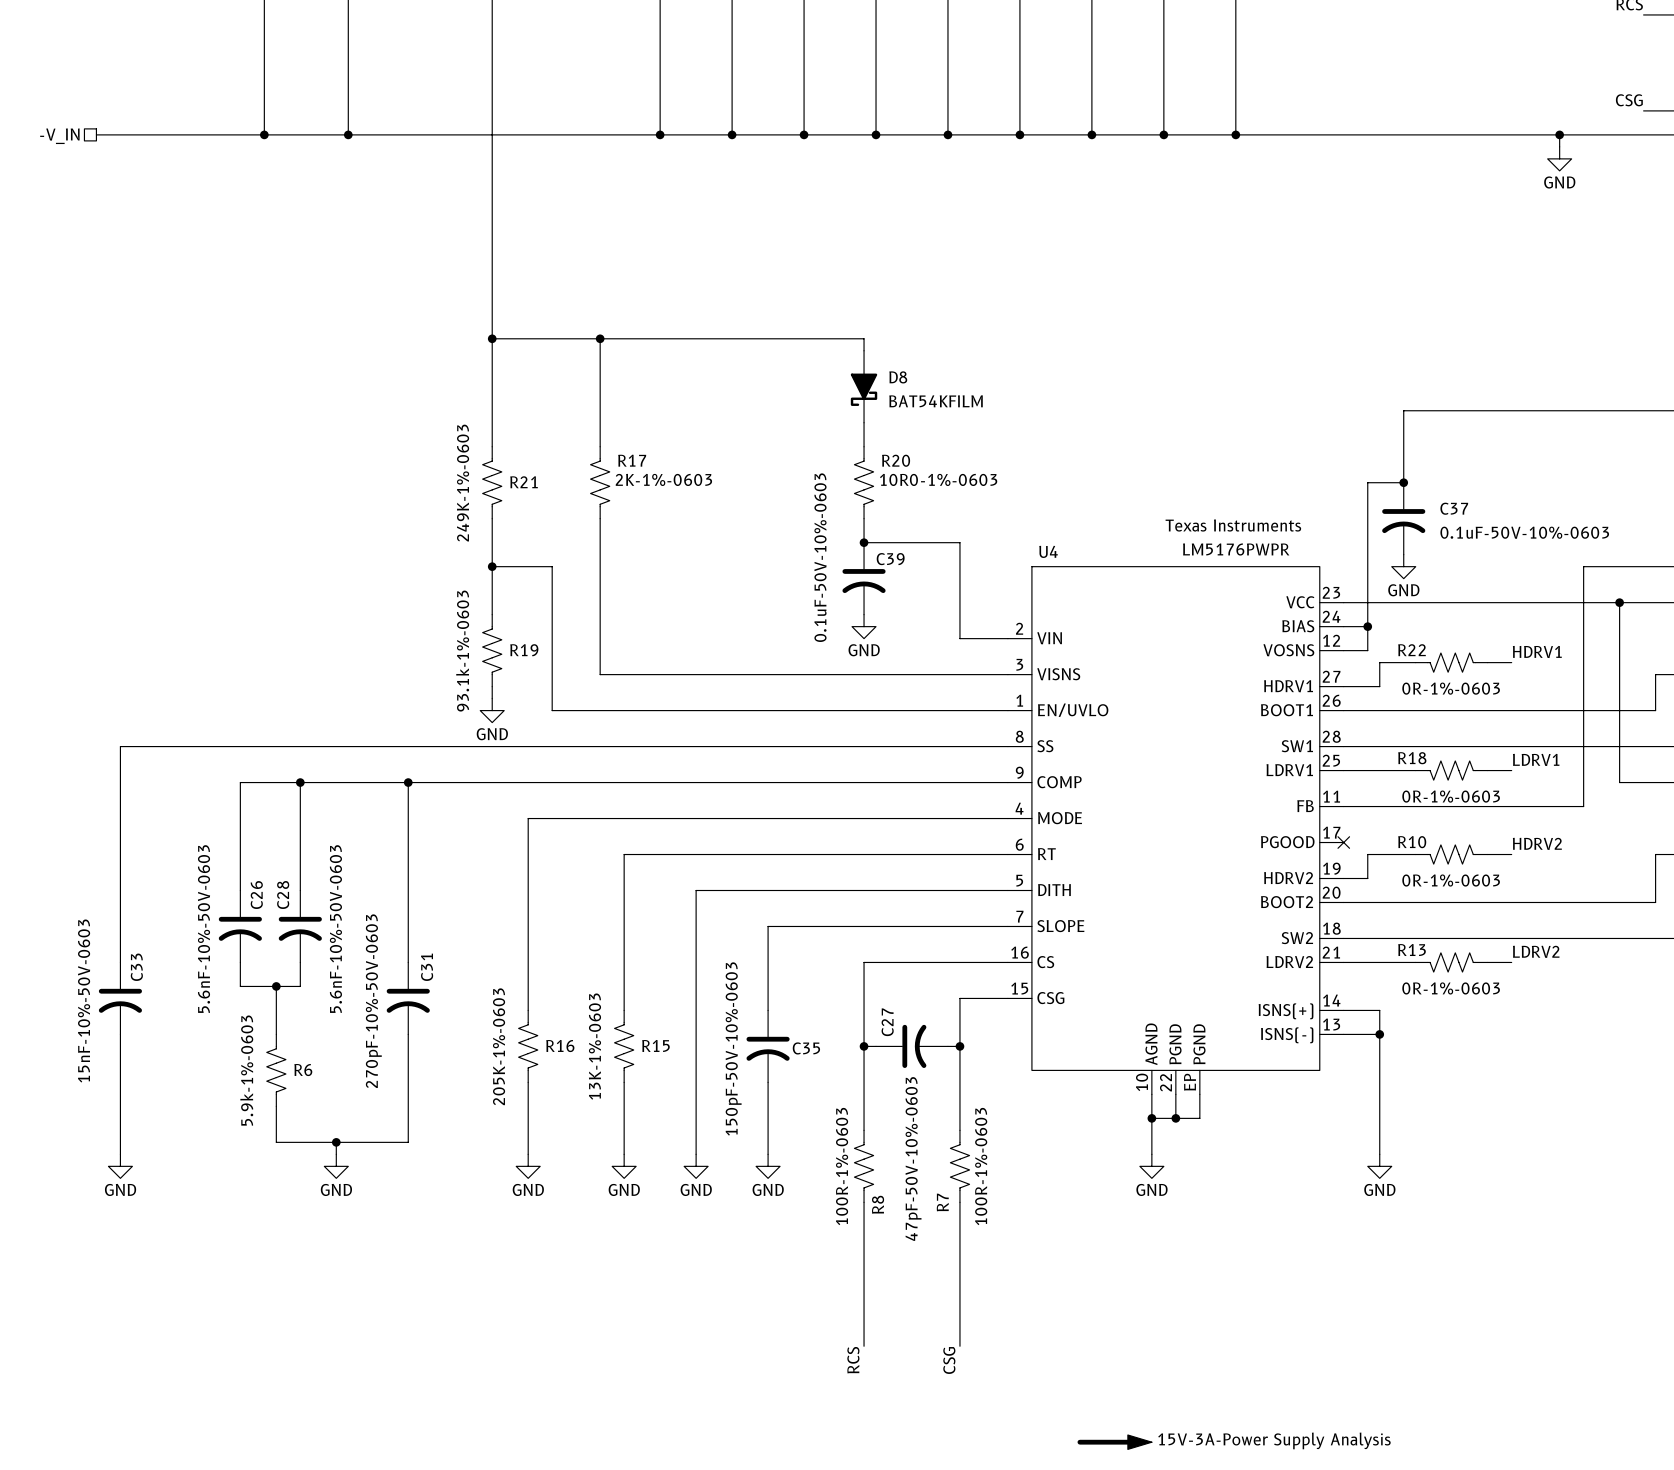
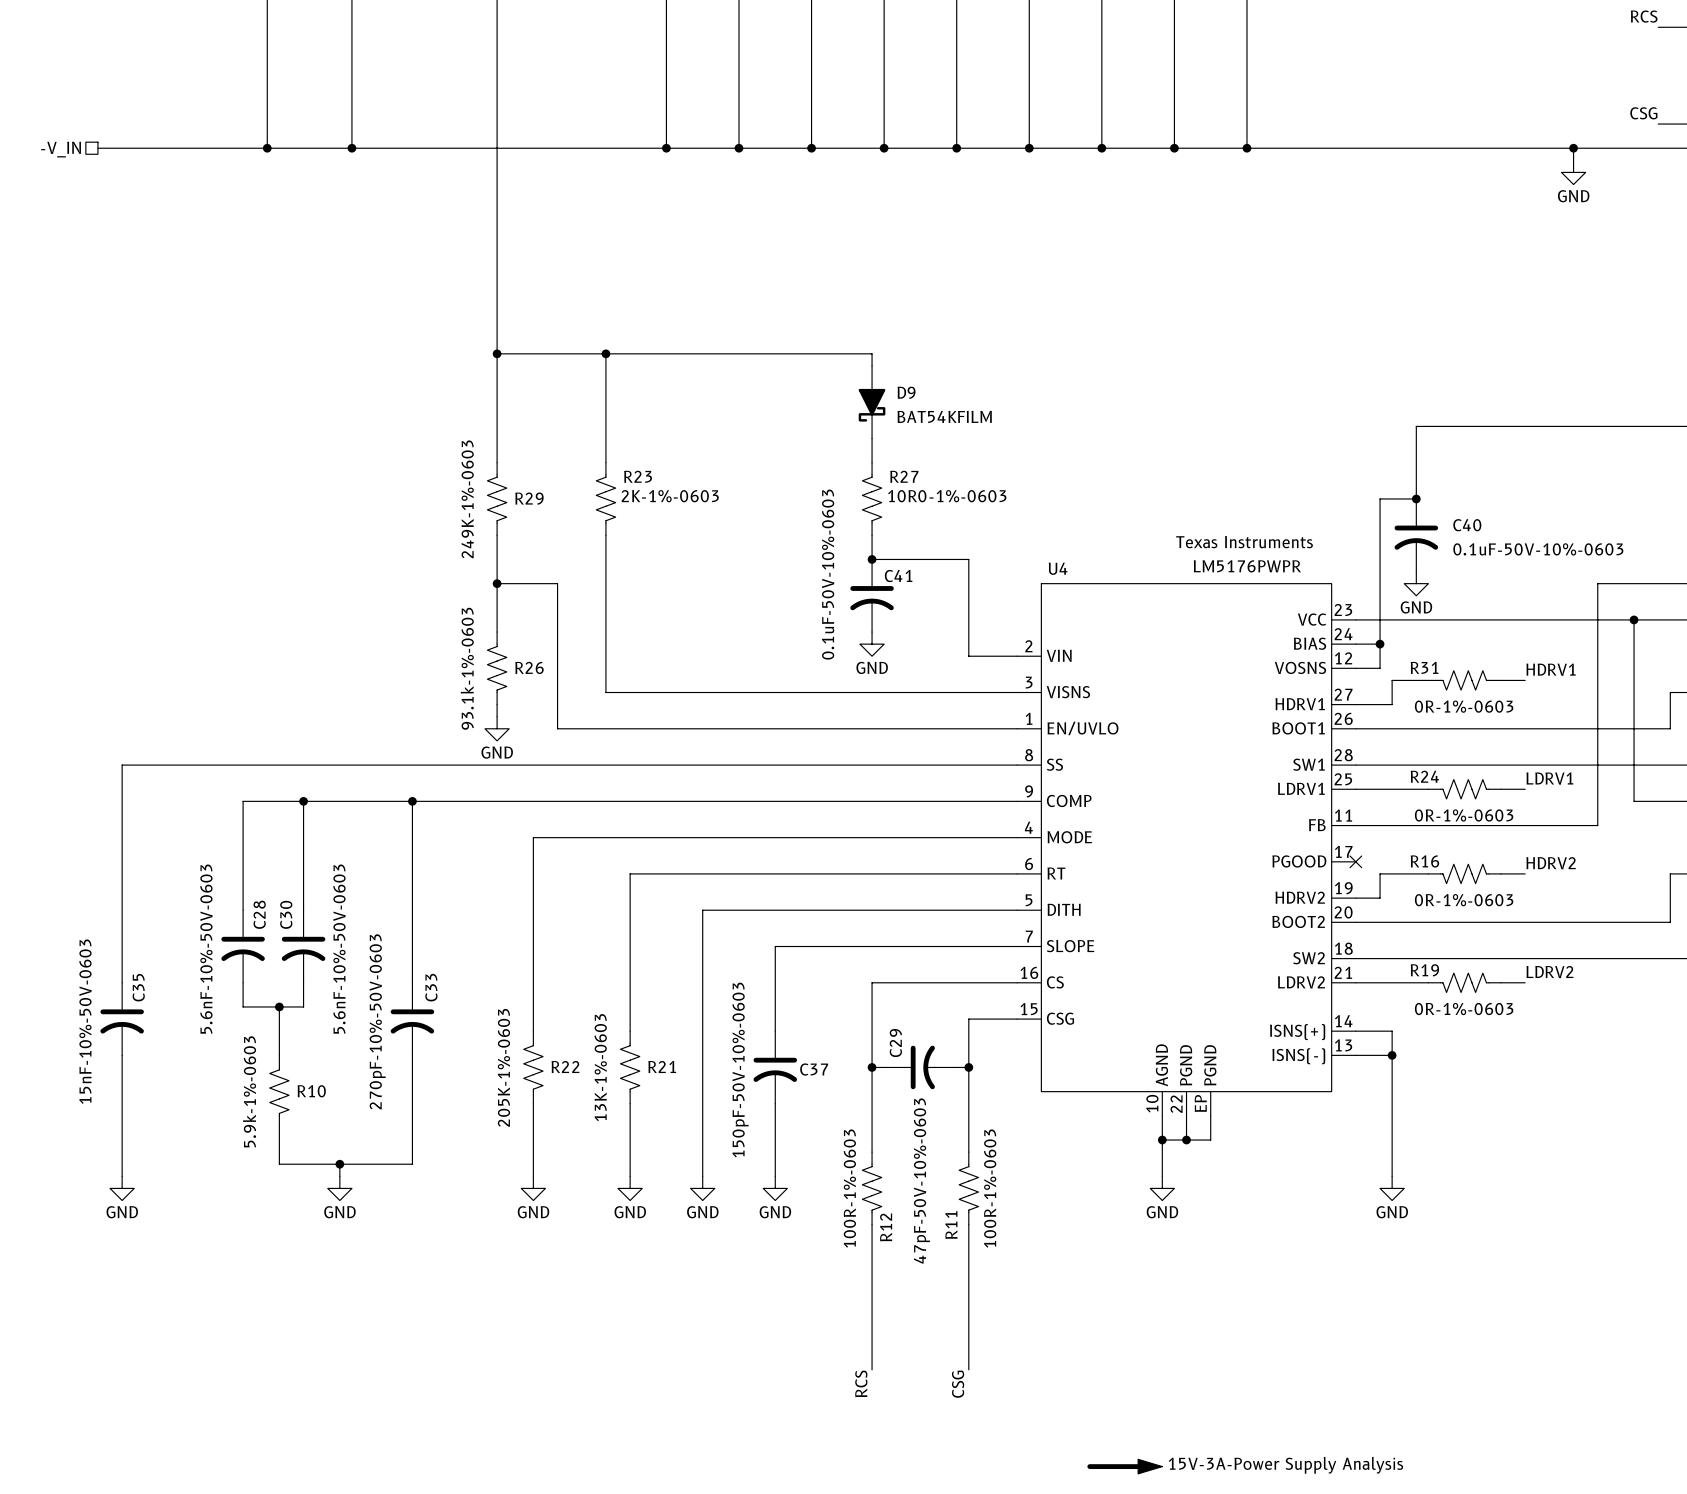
D8 name: D8 (898, 377) -> D9 (906, 392)
R17 name: R17 (632, 460) -> R23 (638, 476)
R20 name: R20 (896, 460) -> R27 (904, 476)
R21 name: R21 (524, 482) -> R29 (529, 498)
C37 name: C37 (1454, 508) -> C40 (1467, 525)
C39 name: C39 (890, 559) -> C41 (898, 576)
R19 name: R19 (524, 650) -> R26 (529, 667)
R22 name: R22 (1411, 650) -> R31 (1424, 667)
R18 name: R18 (1412, 758) -> R24 (1424, 776)
R10 name: R10 (1412, 842) -> R16 (1424, 861)
C26 name: C26 (256, 895) -> C28 (259, 914)
C28 name: C28 (283, 895) -> C30 (286, 914)
R13 name: R13 (1411, 950) -> R19 (1424, 970)
C33 name: C33 (136, 967) -> C35 (138, 987)
C31 name: C31 (427, 967) -> C33 (431, 987)
C27 name: C27 (887, 1022) -> C29 (895, 1043)
R15 name: R15 (655, 1045) -> R21 (662, 1067)
R16 name: R16 (560, 1046) -> R22 (565, 1067)
C35 name: C35 (806, 1048) -> C37 (814, 1069)
R6 name: R6 (303, 1070) -> R10 (311, 1091)
R7 name: R7 (942, 1202) -> R11 (951, 1225)
R8 name: R8 (878, 1204) -> R12 (886, 1227)

